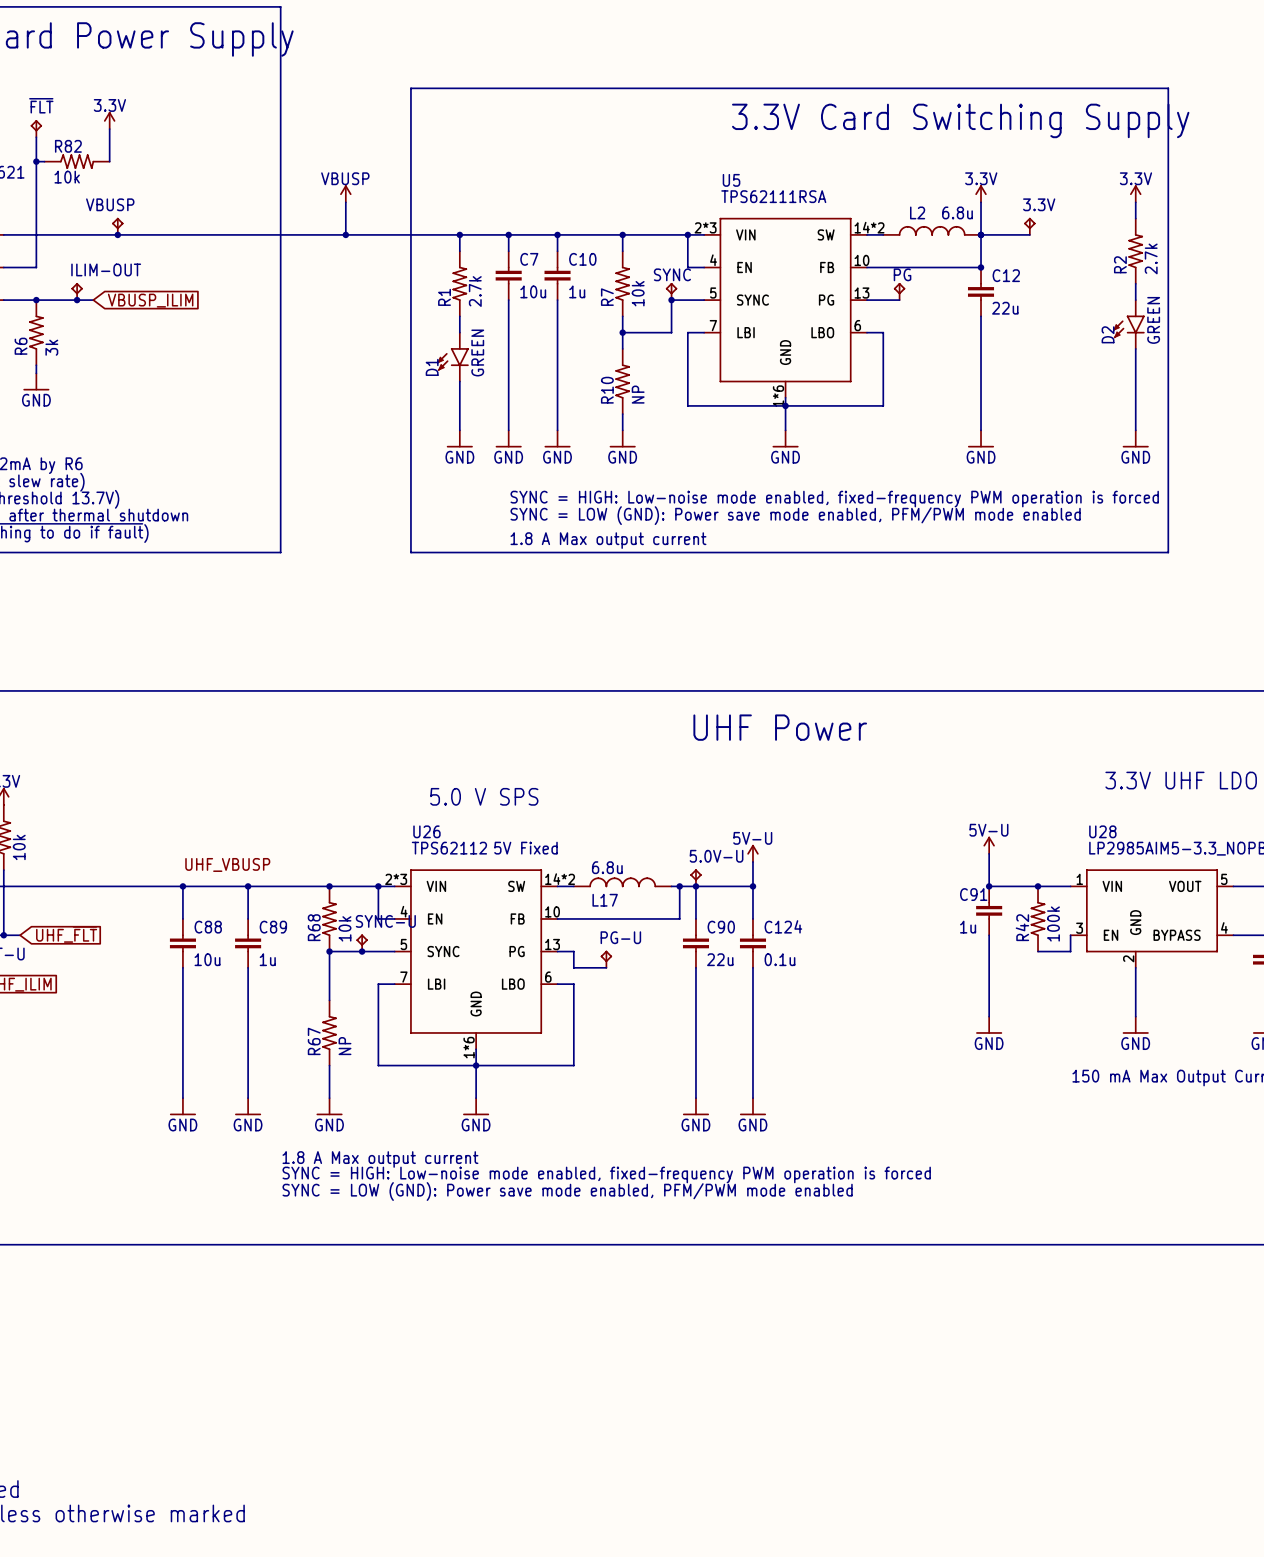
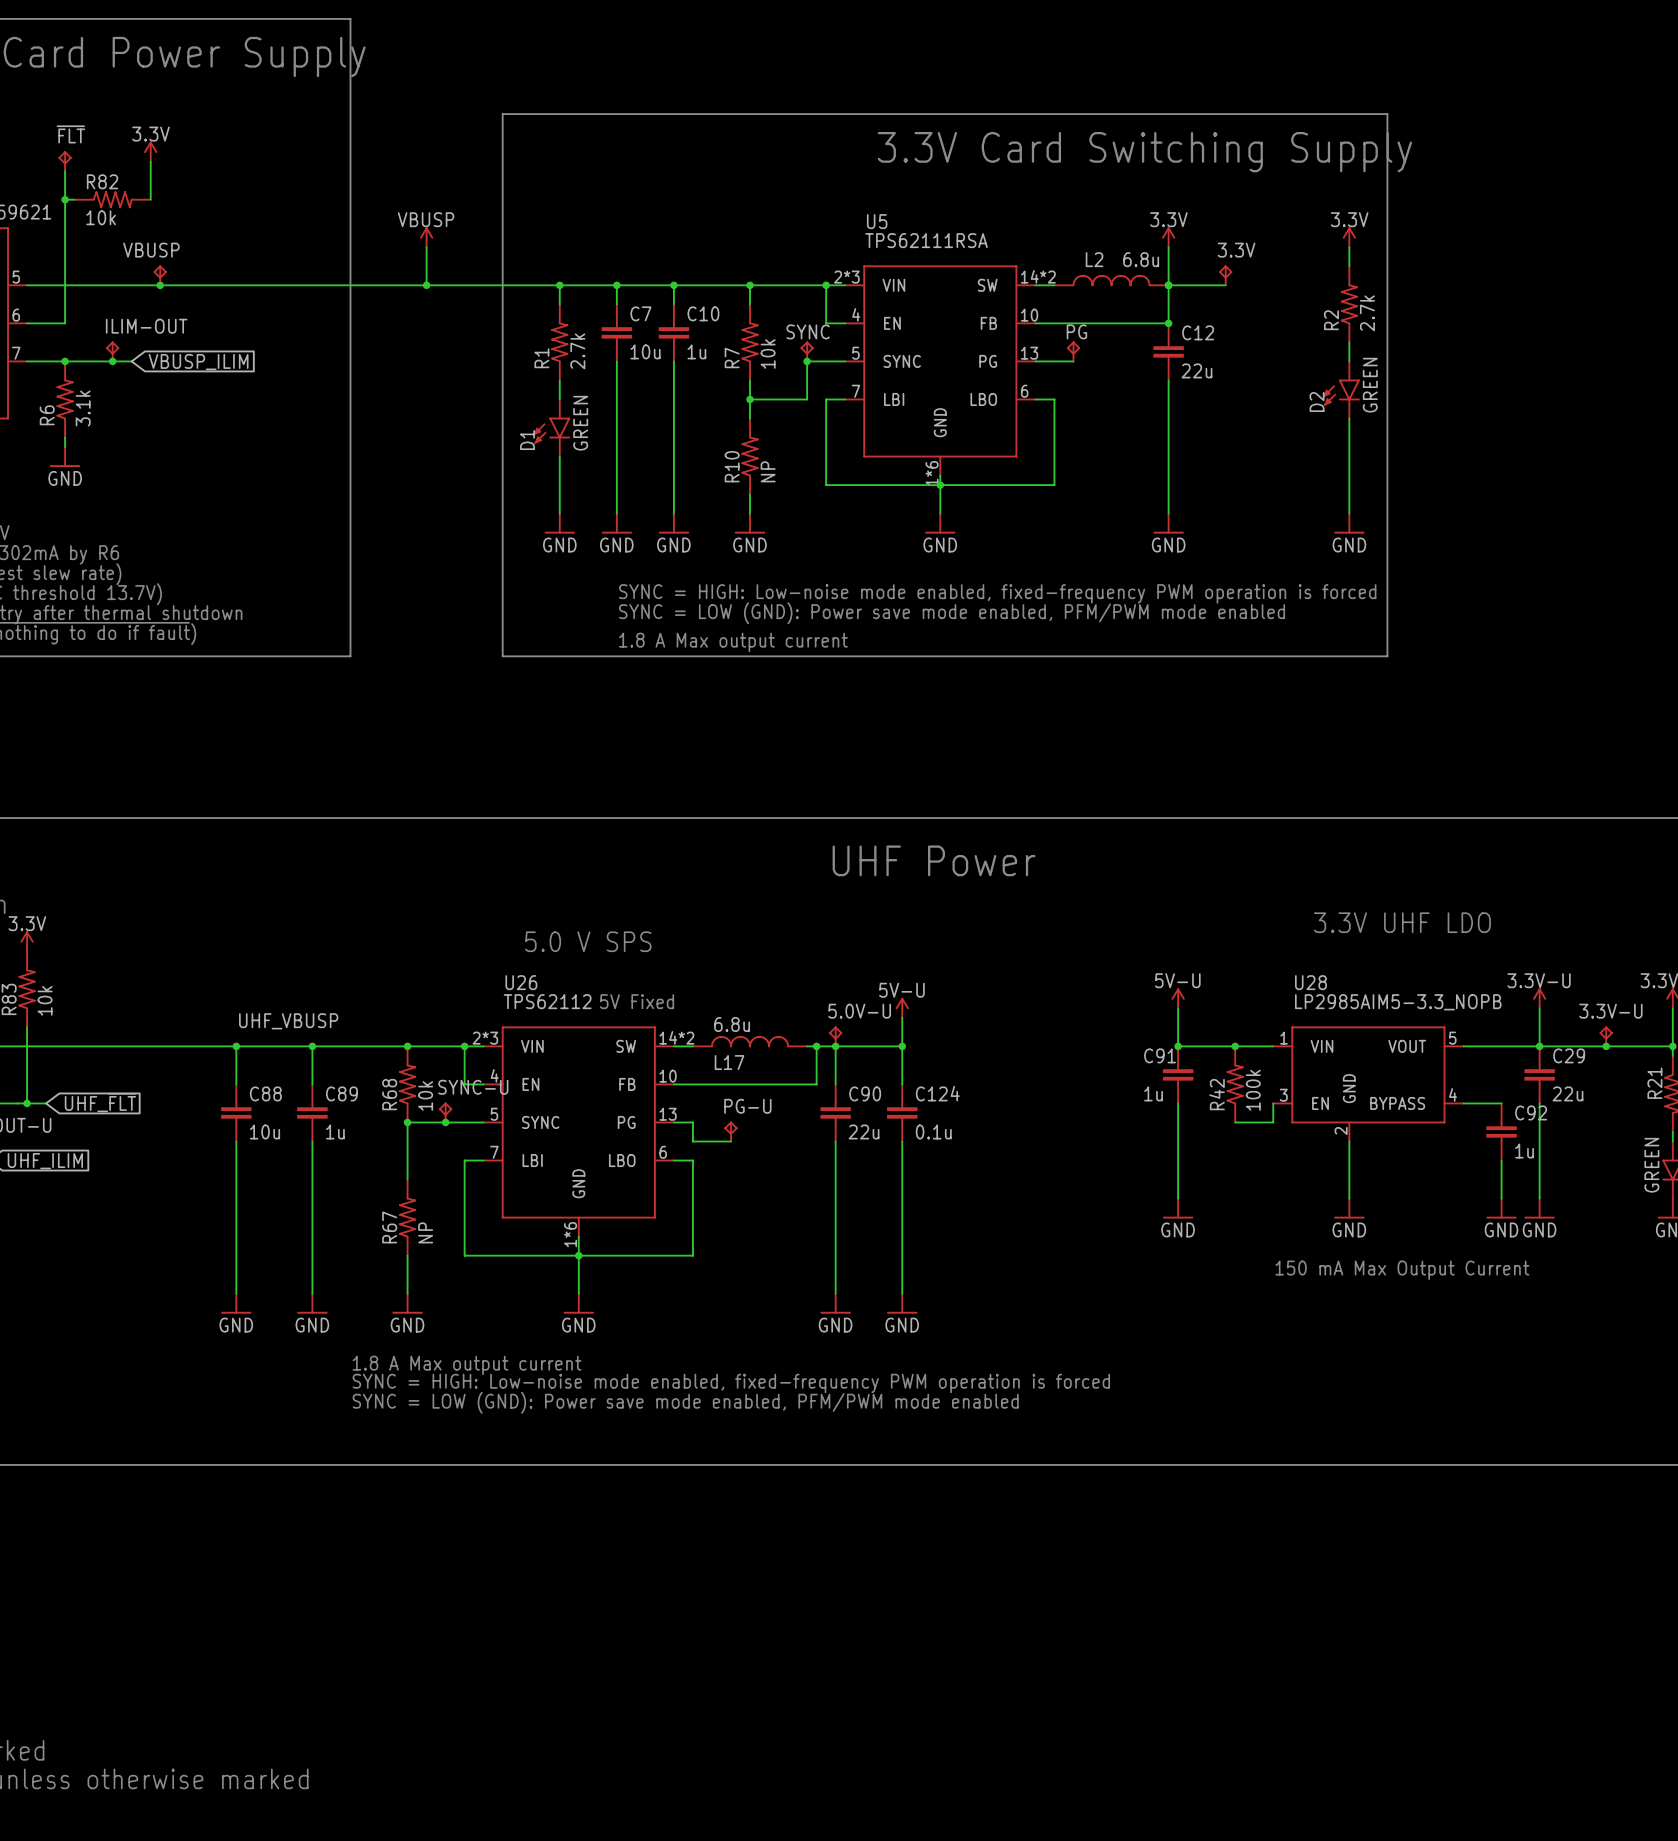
R6 value: 3k (51, 347) -> 3.1k (83, 408)

